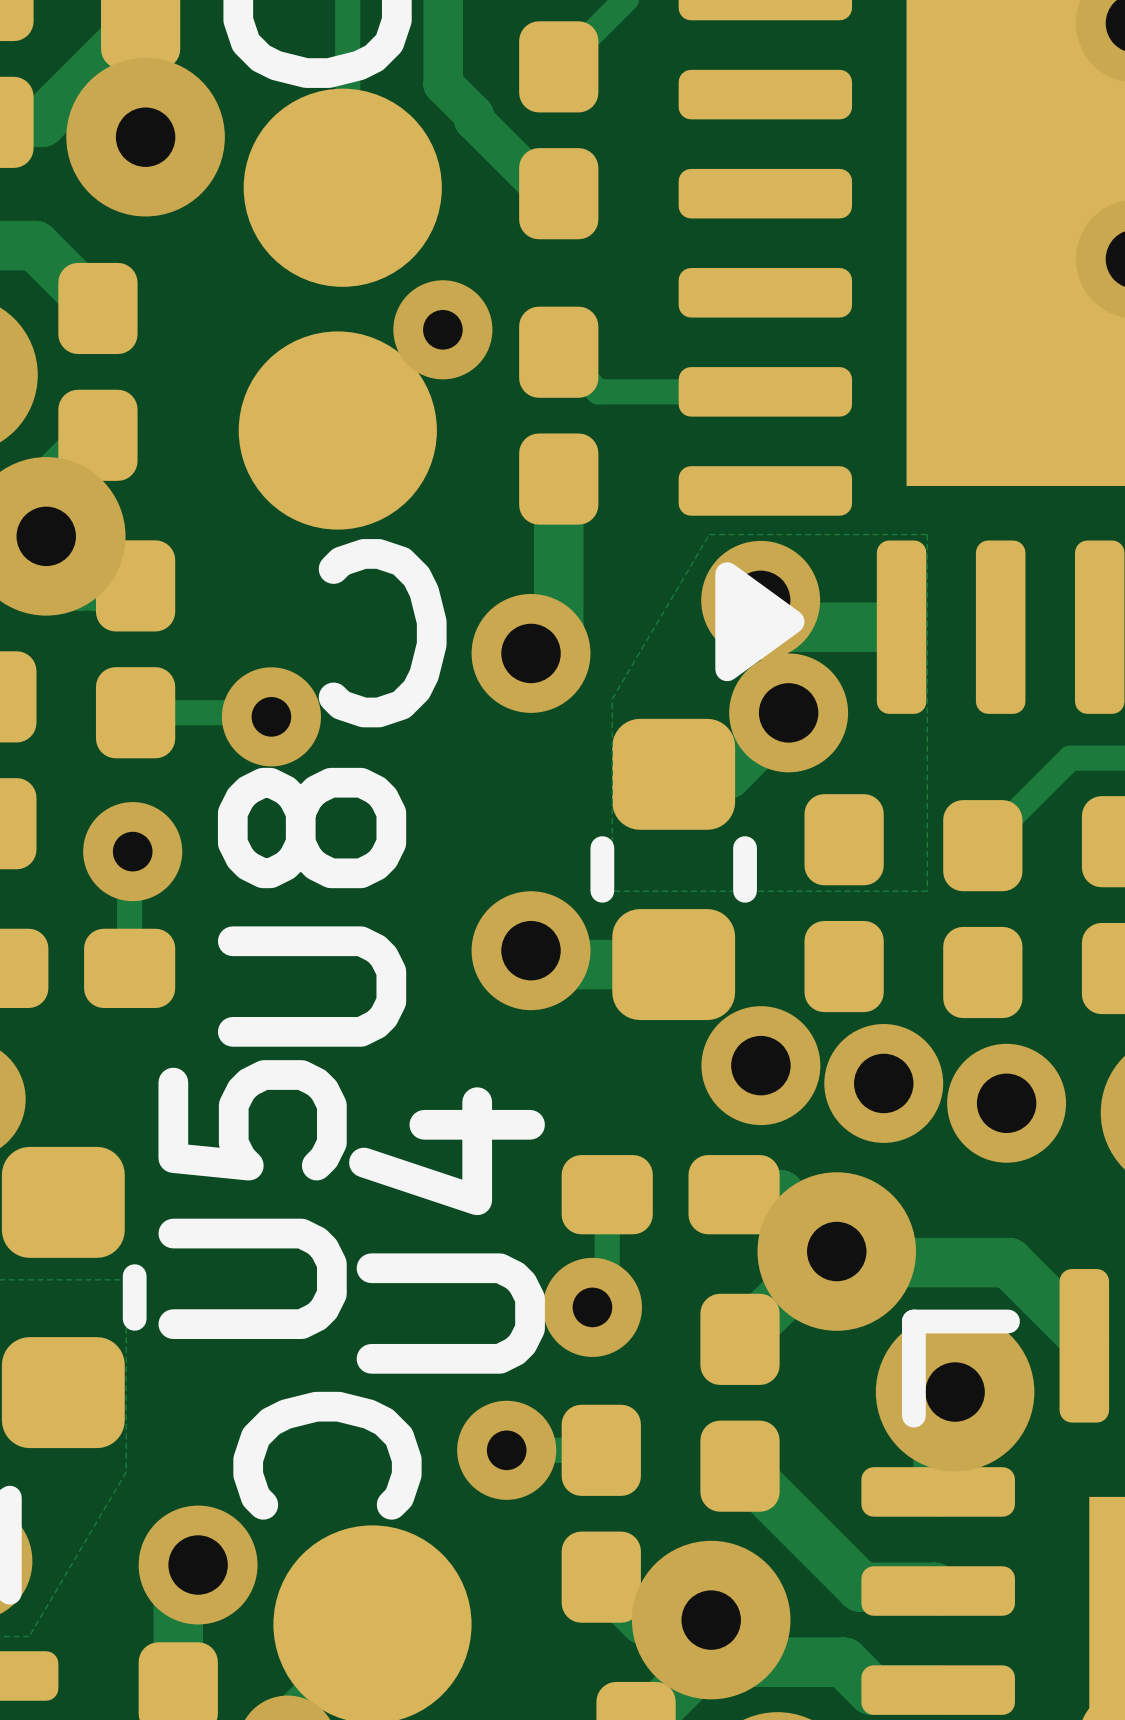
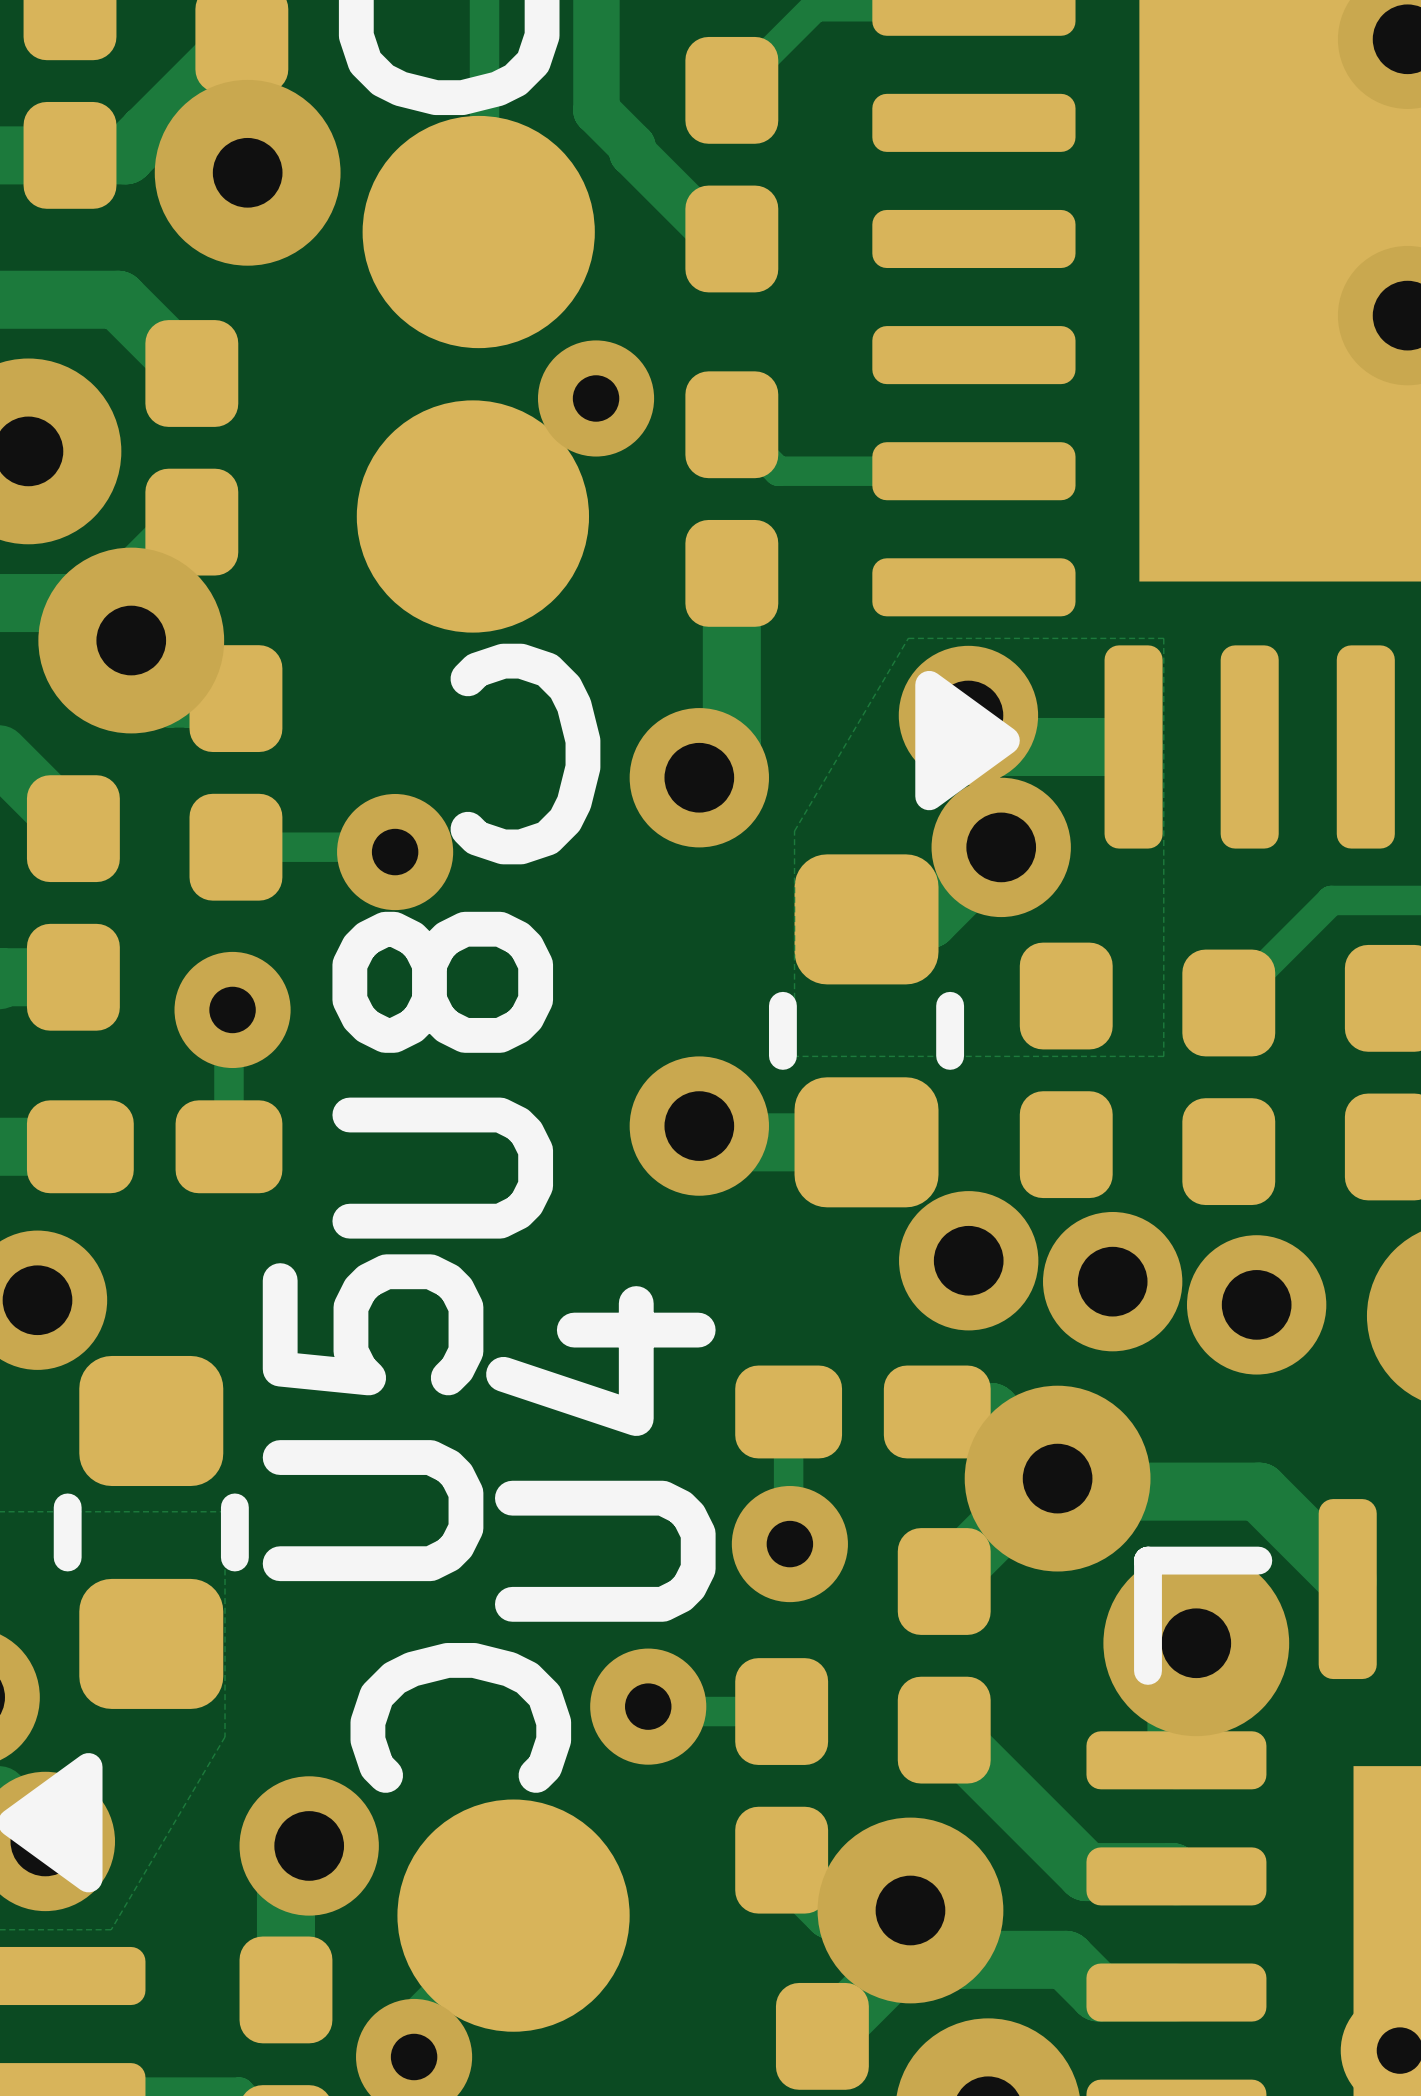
via position: (592, 1307) -> (789, 1544)
via position: (506, 1450) -> (648, 1706)

